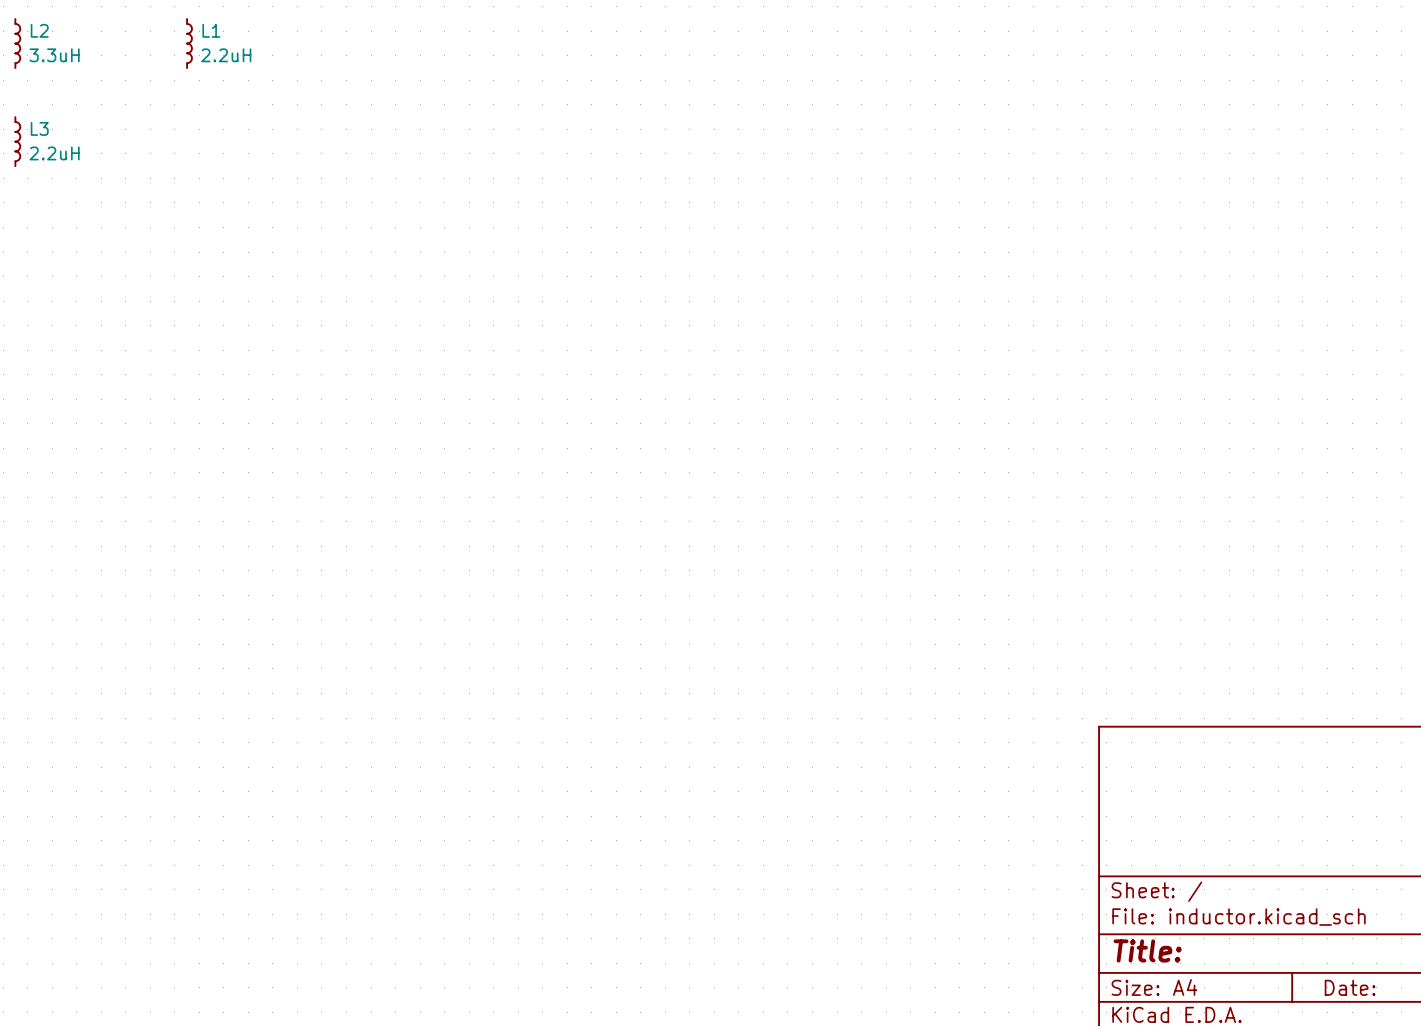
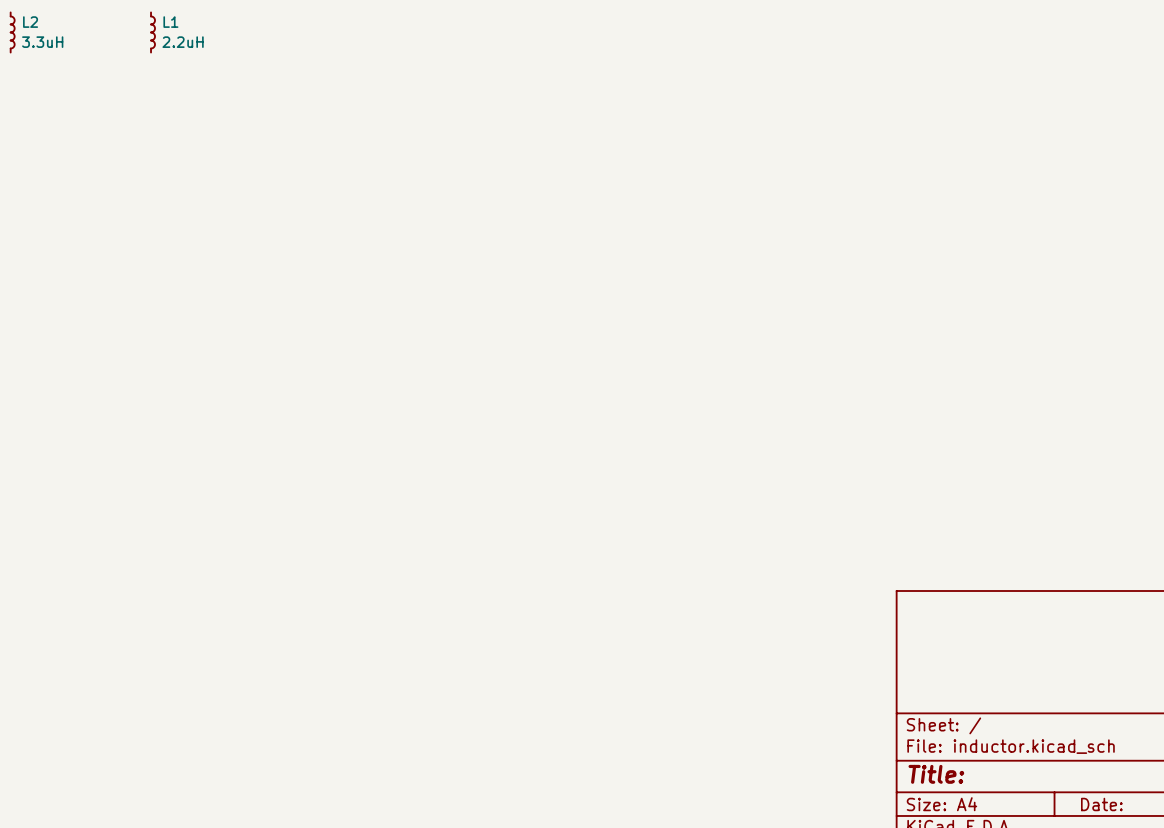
L3: 2.2uH (17, 141) -> none

